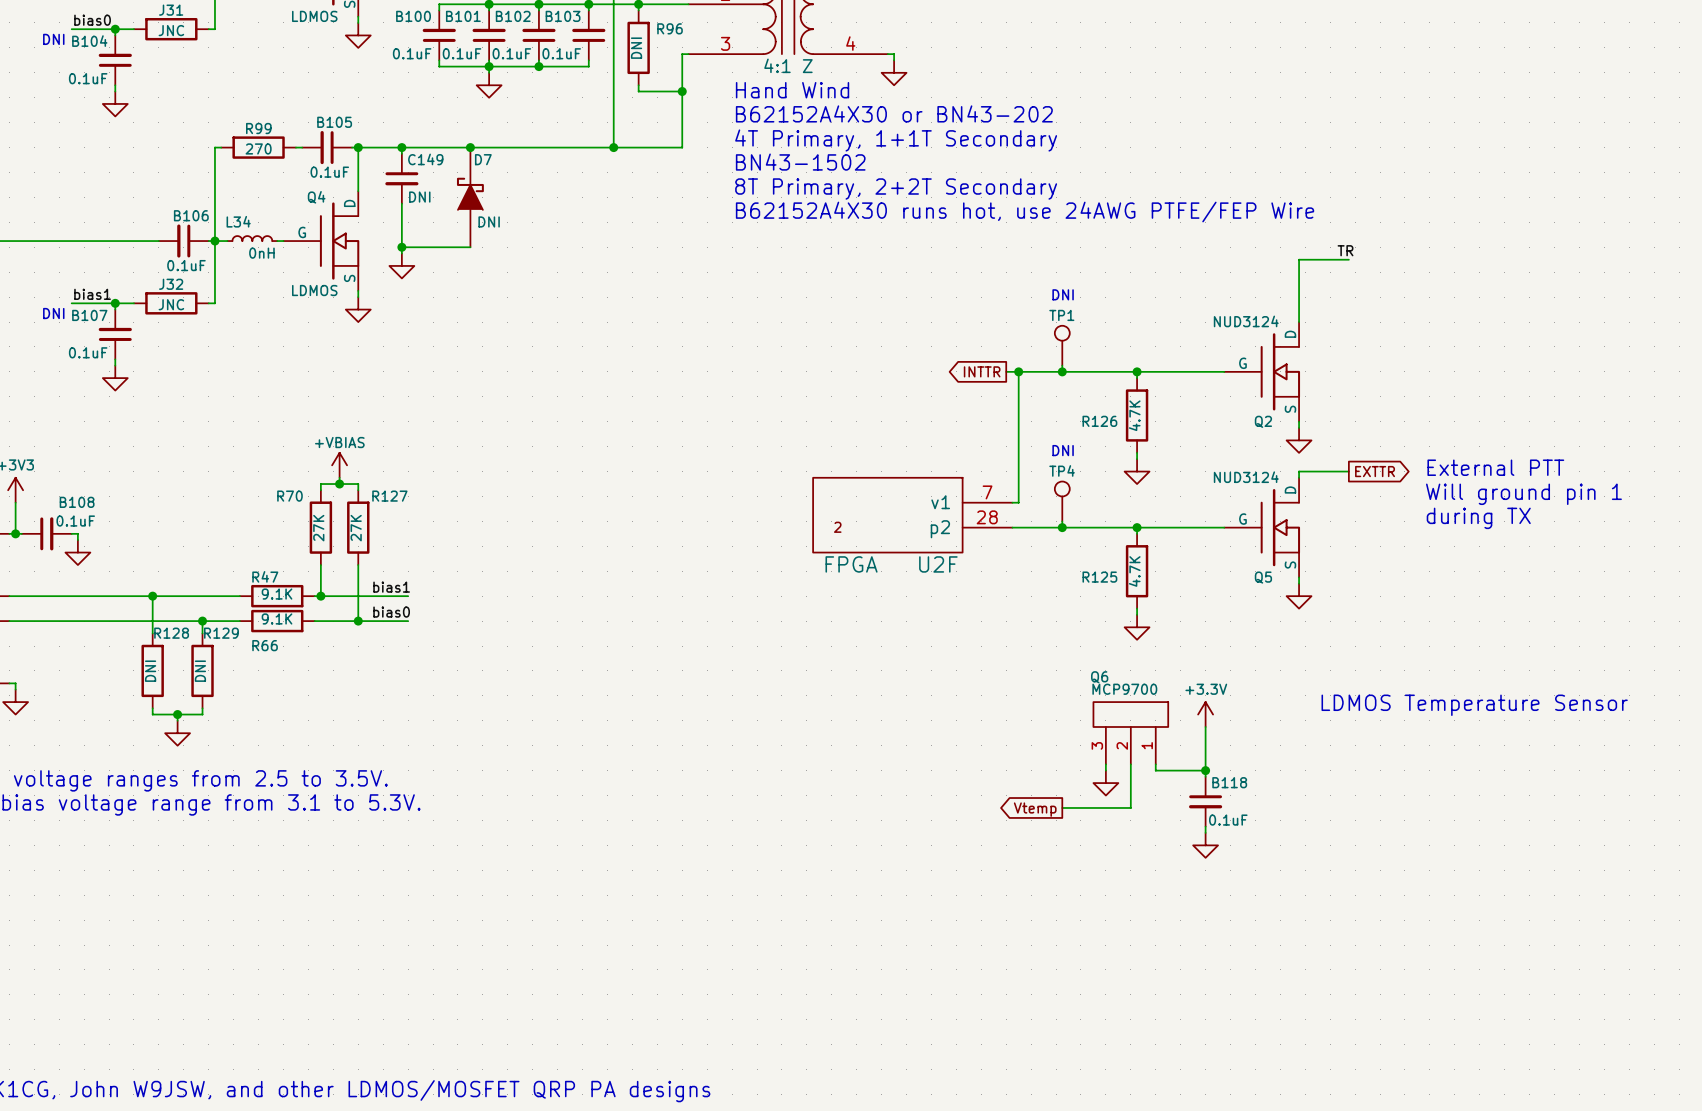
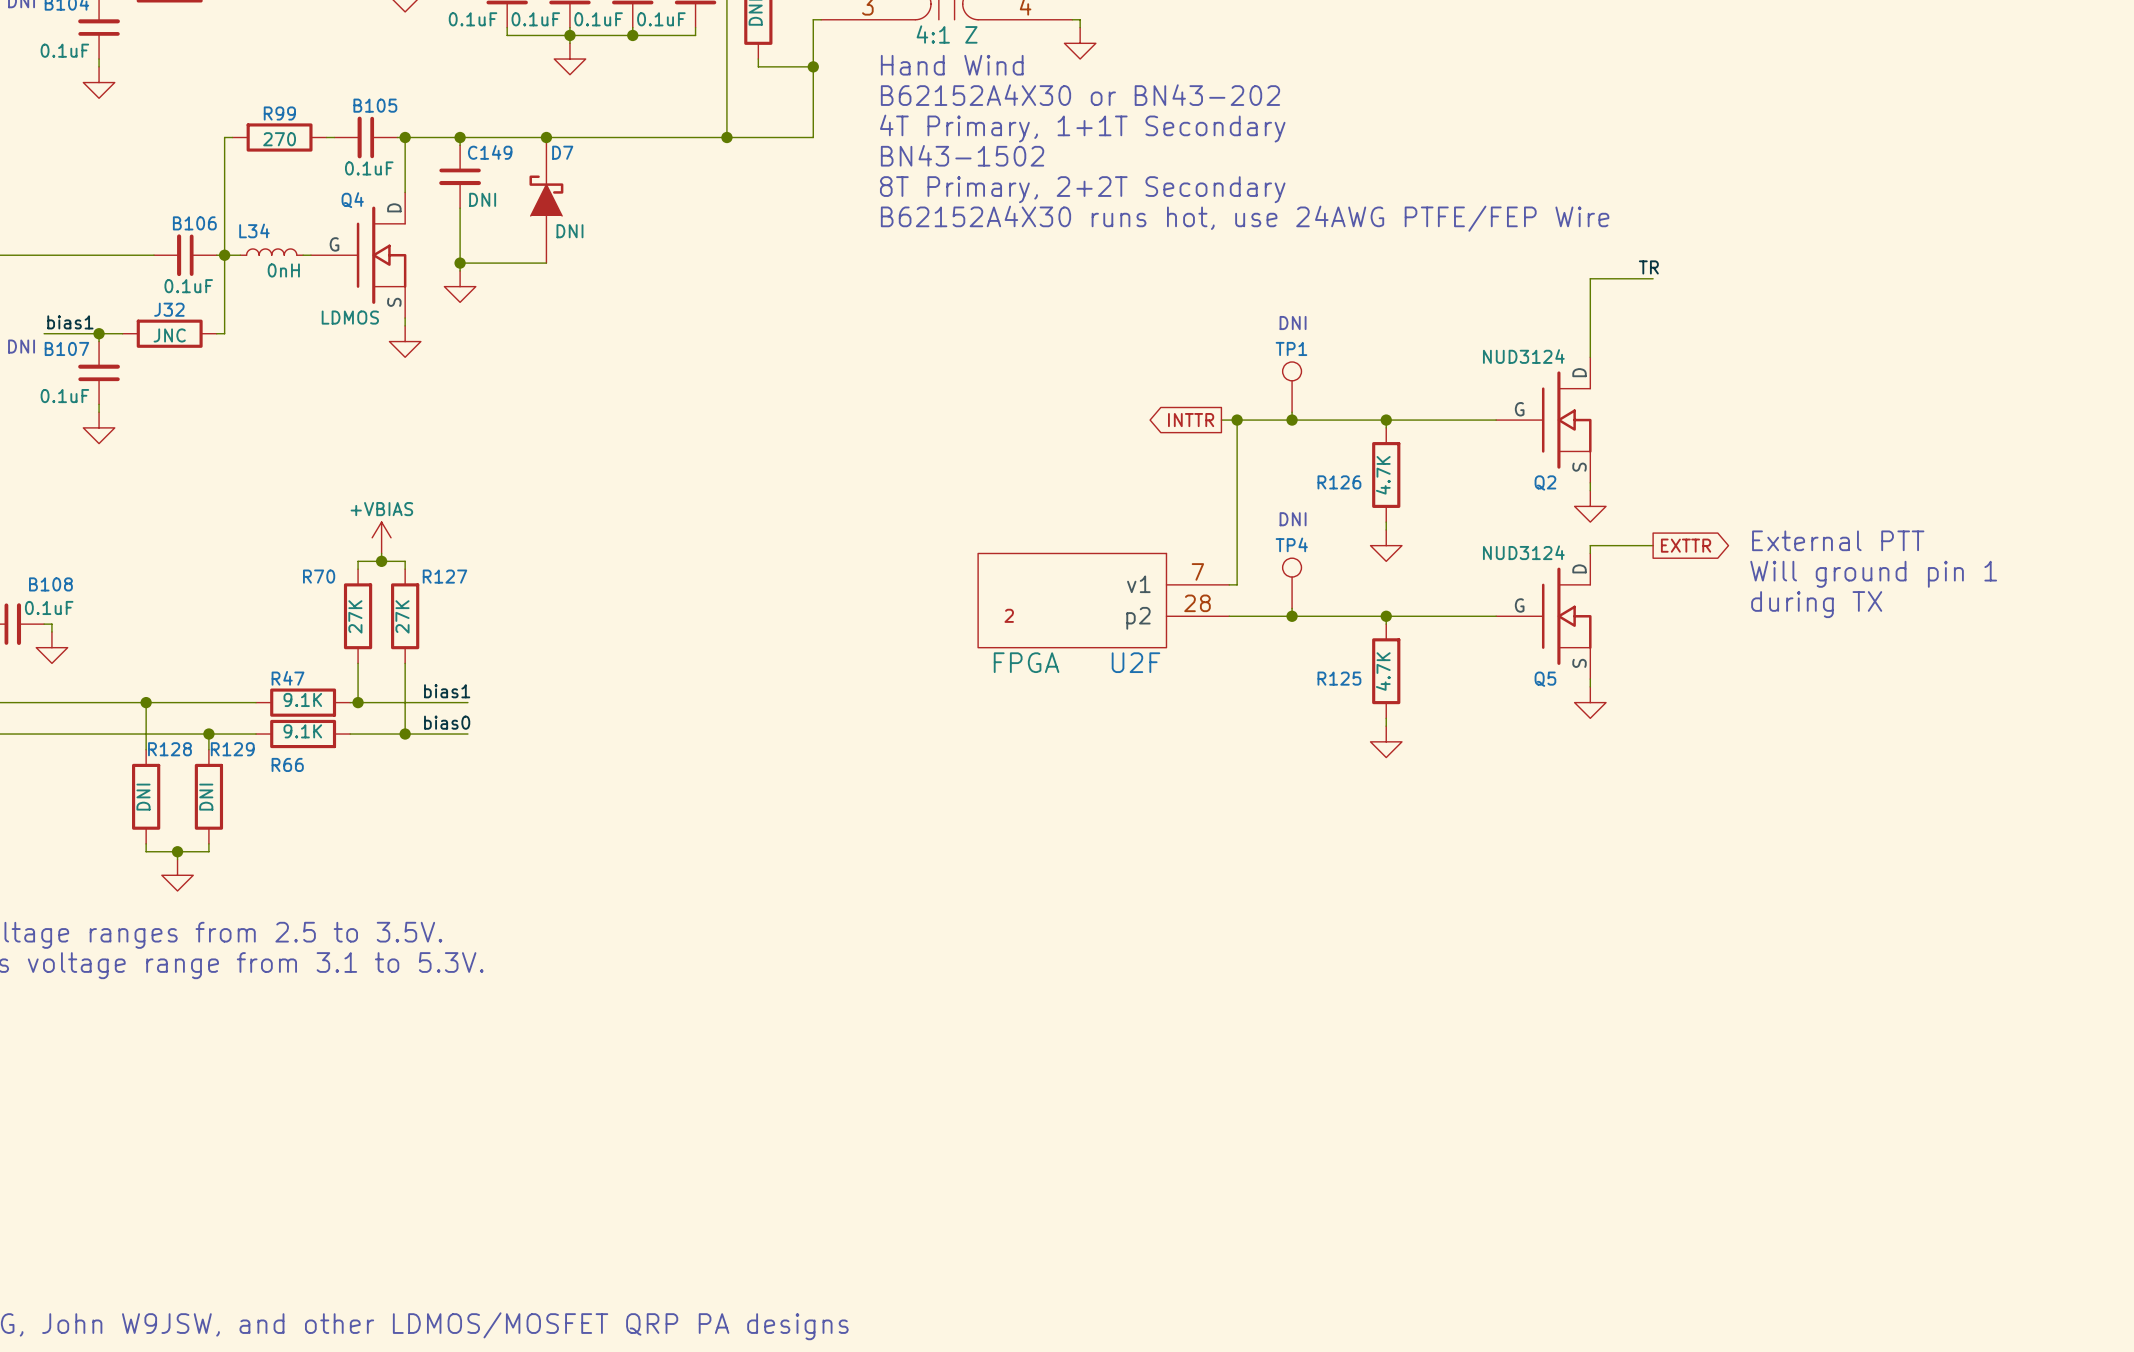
text: LDMOS Temperature Sensor (1474, 705) -> none
power symbol: +3.3V (1205, 714) -> none
wire: (1205, 726) (1205, 776) -> none
Q6: MCP9700 (1130, 733) -> none
wire: (1105, 764) (1105, 770) -> none
wire: (1130, 764) (1130, 807) (1062, 807) -> none
wire: (1155, 764) (1155, 770) (1205, 770) -> none
junction: (1205, 770) -> none
power symbol: (1105, 783) -> none
B118: 0.1uF (1205, 801) -> none
global label: Vtemp (1035, 809) -> none
wire: (1205, 826) (1205, 832) -> none
power symbol: (1205, 845) -> none

